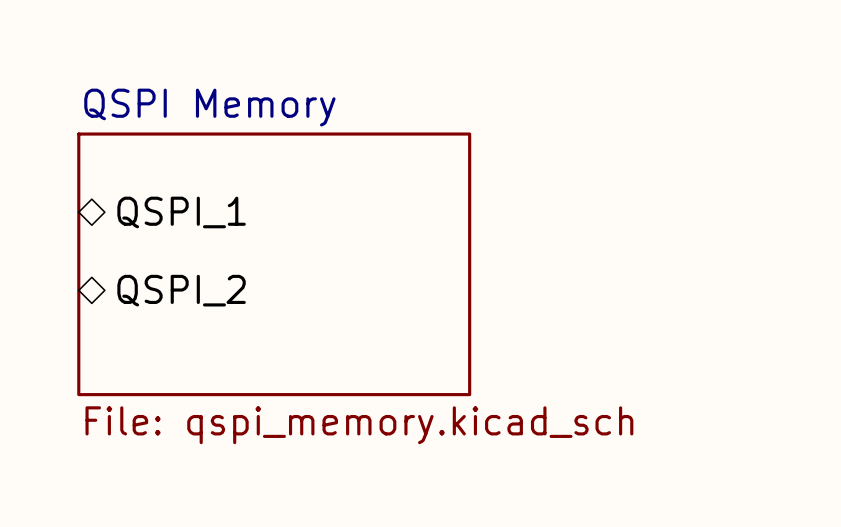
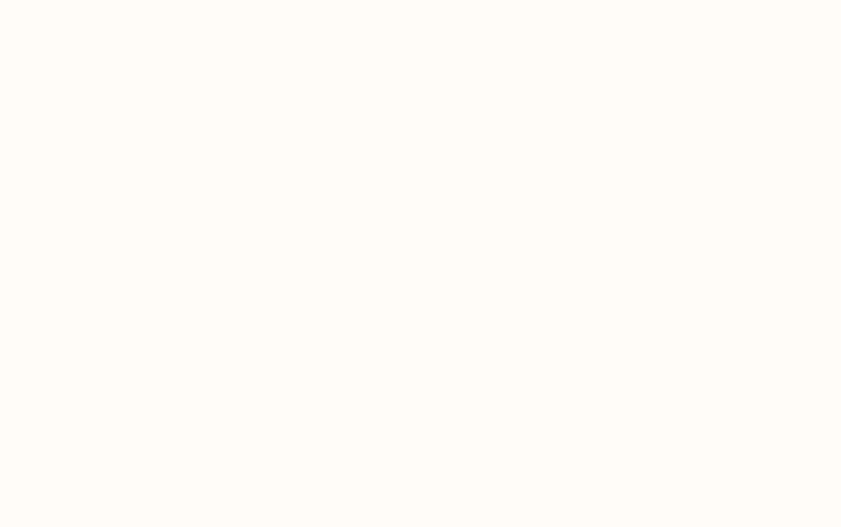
sheet pin: QSPI_1 (181, 212) -> none
sheet QSPI Memory: File: qspi_memory.kicad_sch (274, 264) -> none
sheet pin: QSPI_2 (181, 290) -> none

